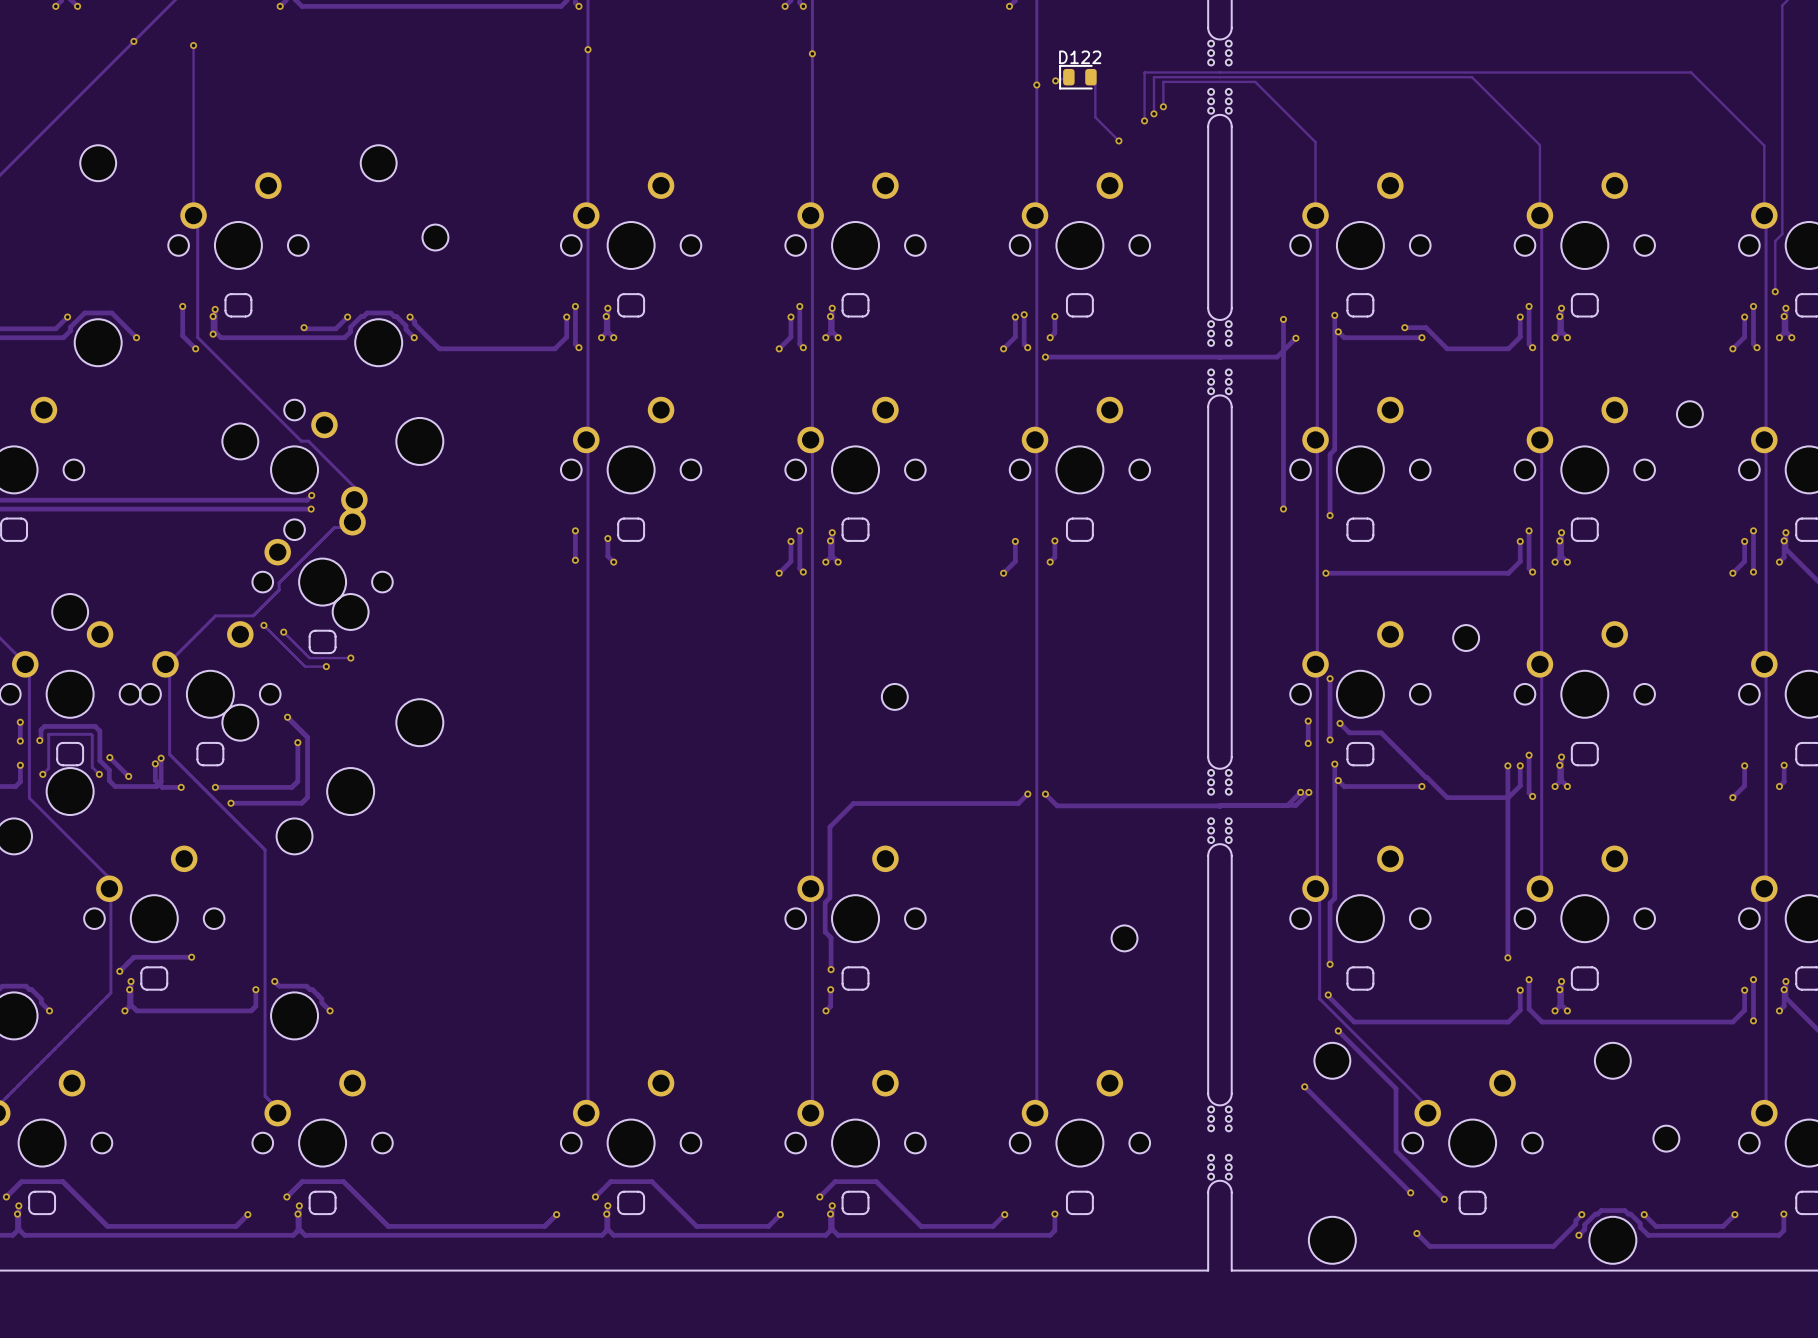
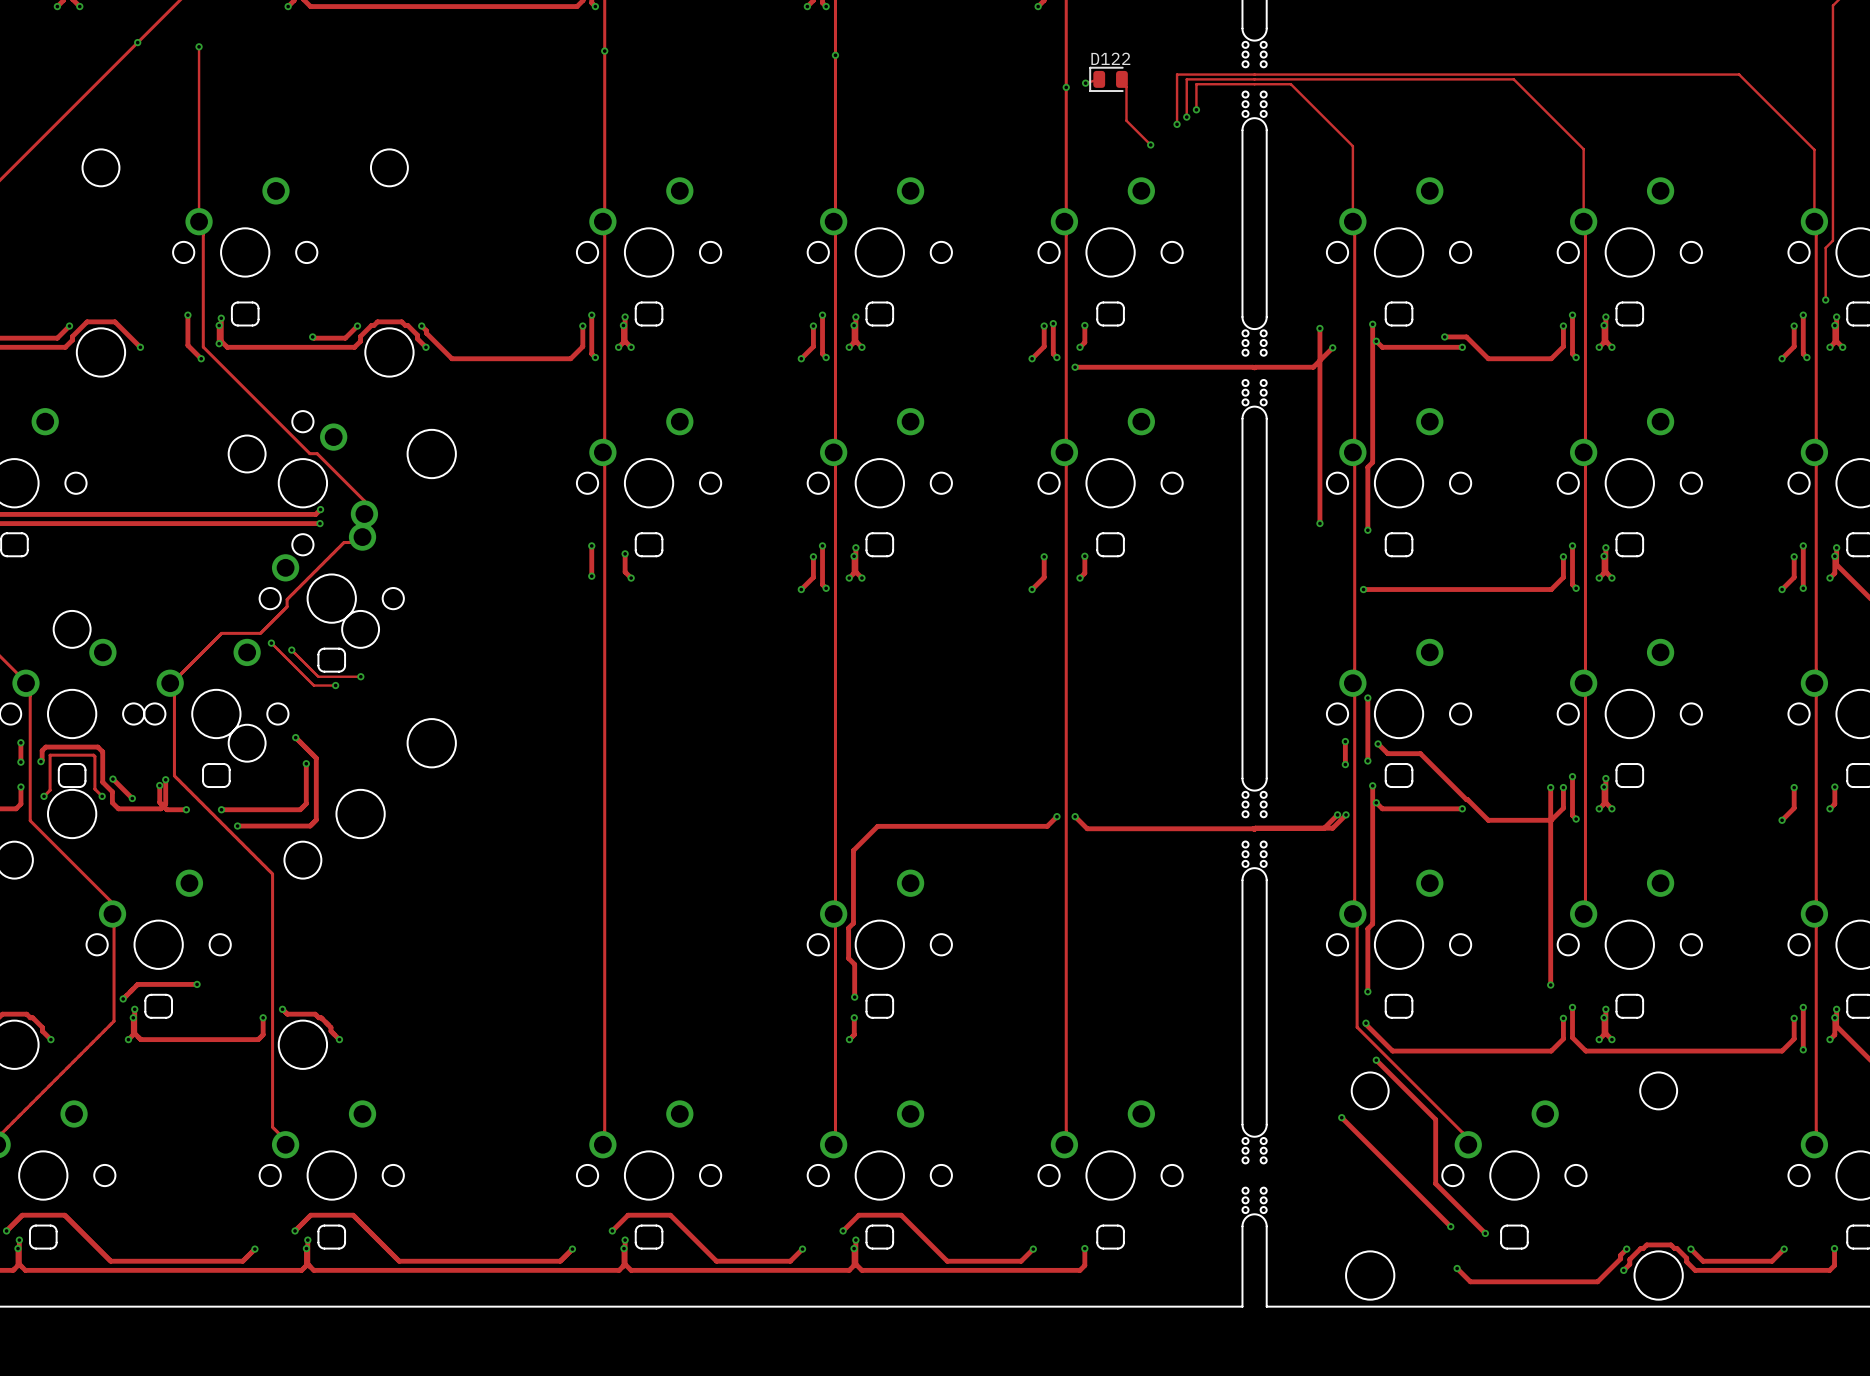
part: (435, 237) -> none
part: (1689, 414) -> none
part: (1466, 638) -> none
part: (894, 696) -> none
part: (1124, 938) -> none
part: (1666, 1138) -> none

